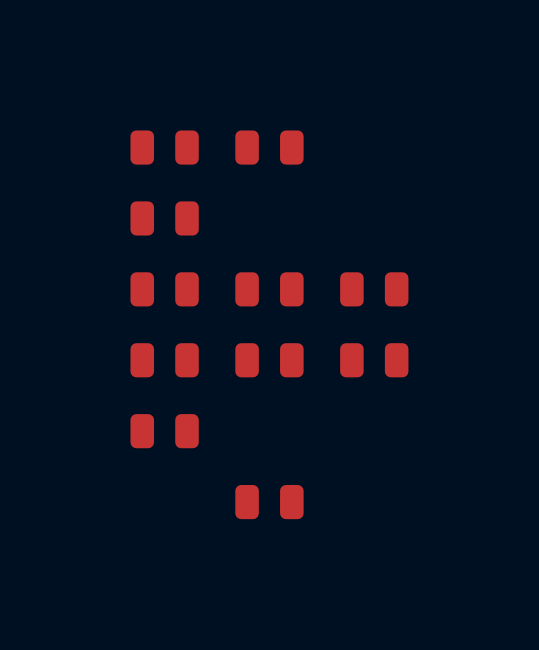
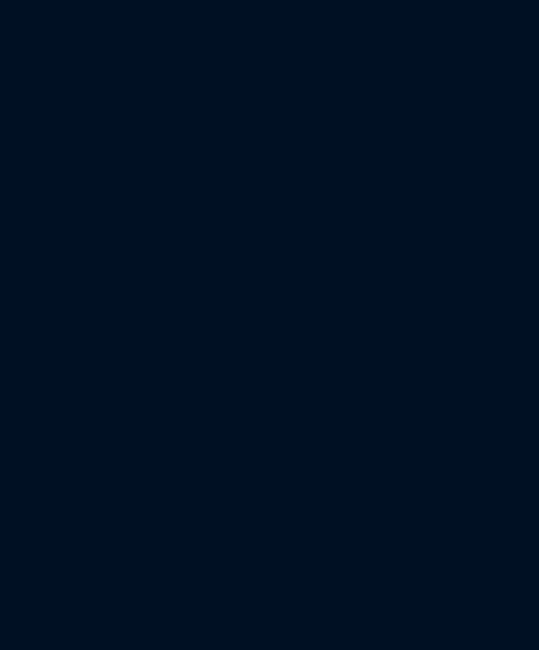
part: (164, 147) -> none
part: (269, 147) -> none
part: (164, 218) -> none
part: (164, 289) -> none
part: (269, 289) -> none
part: (374, 289) -> none
part: (164, 360) -> none
part: (269, 360) -> none
part: (374, 360) -> none
part: (164, 431) -> none
part: (269, 502) -> none

